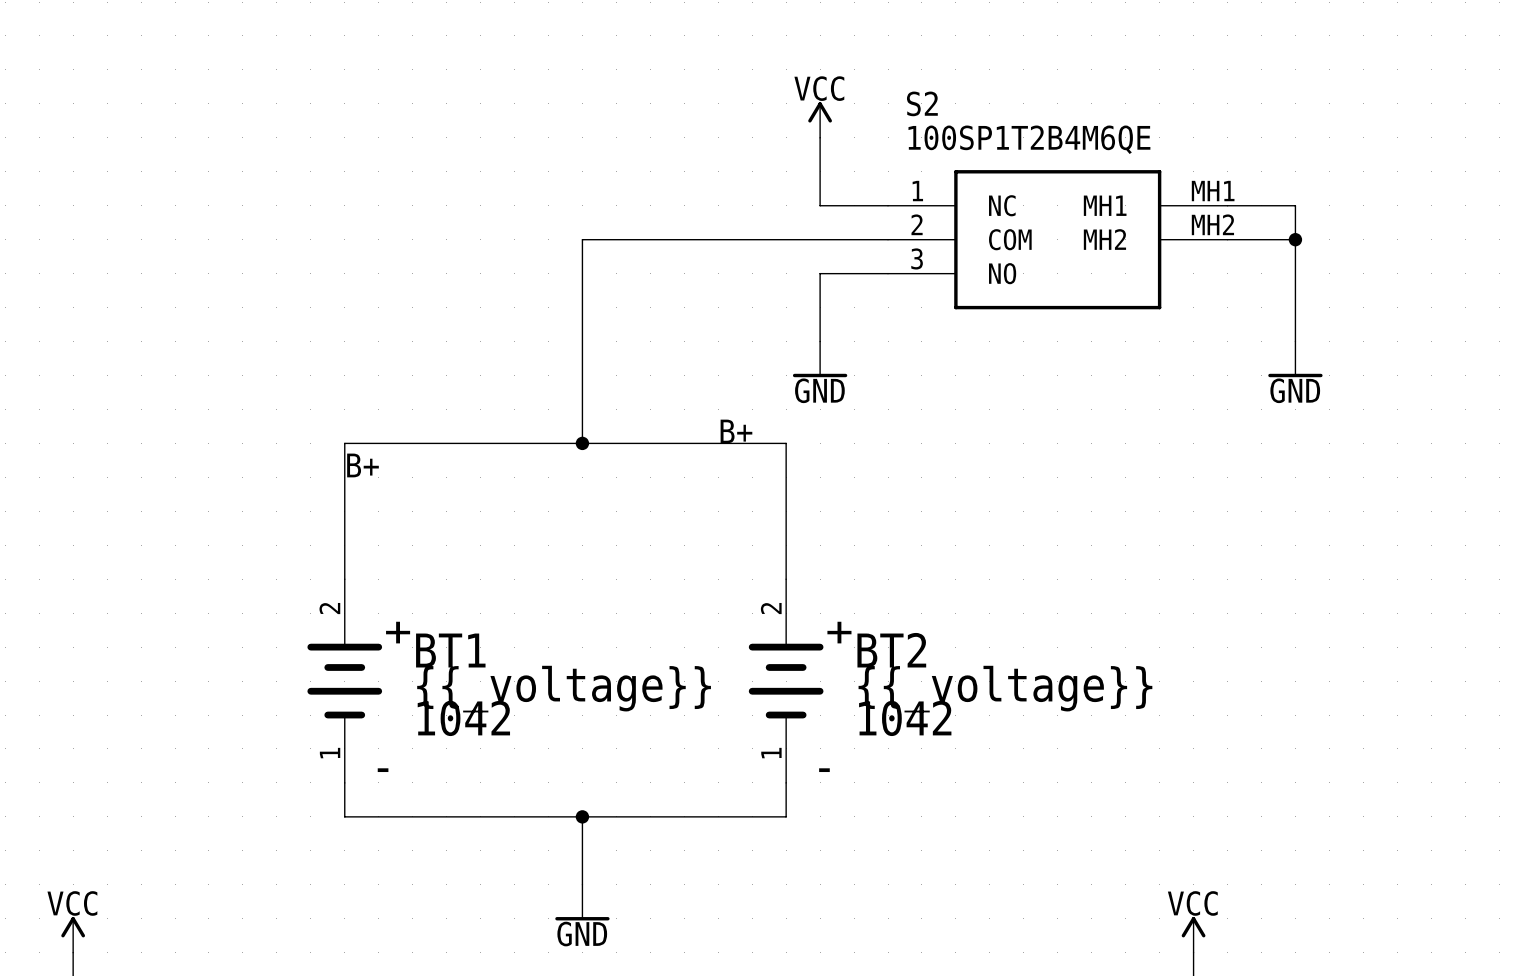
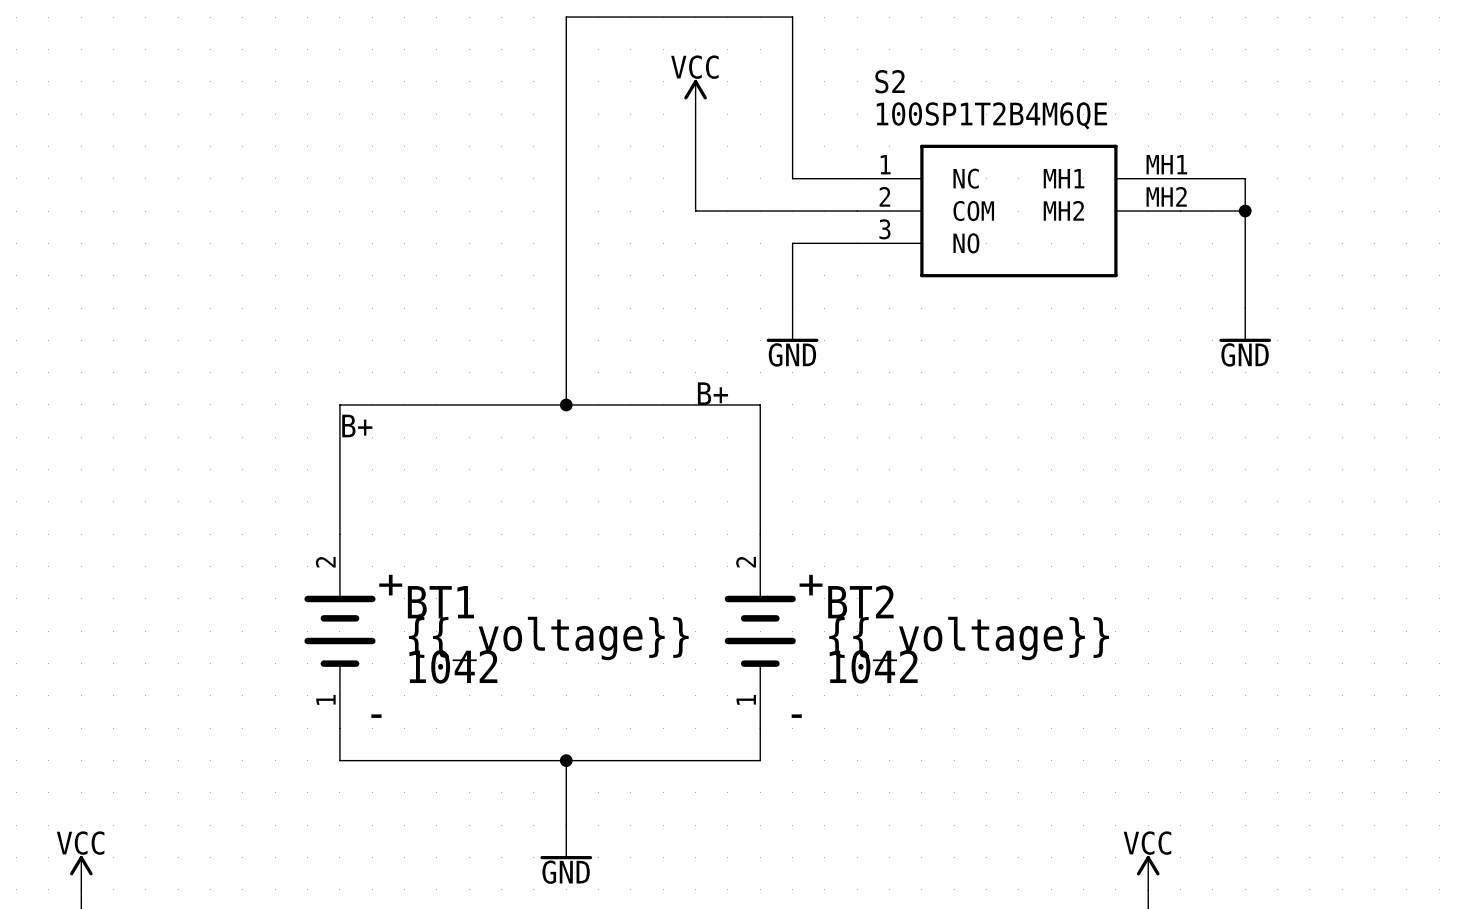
power symbol position: VCC (820, 120) -> VCC (695, 97)
wire: none -> (695, 114) (695, 211)
wire: (582, 239) (718, 239) -> (566, 211) (566, 17) (792, 17) (792, 114)

